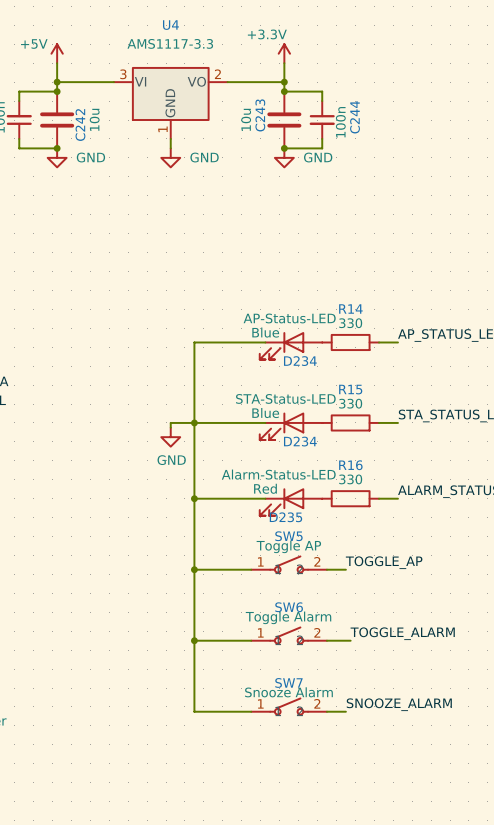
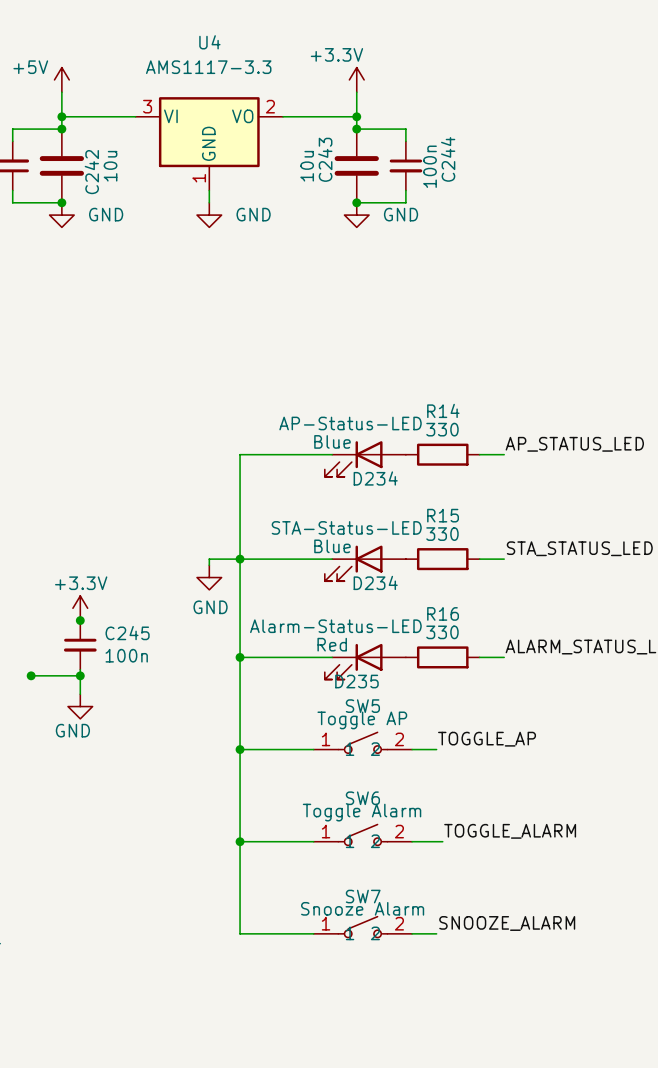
power symbol: none -> +3.3V (80, 608)
junction: none -> (80, 620)
C245: none -> 100n (80, 645)
wire: none -> (80, 669) (80, 694)
wire: none -> (31, 675) (80, 675)
junction: none -> (31, 675)
junction: none -> (80, 675)
power symbol: none -> GND (80, 706)

